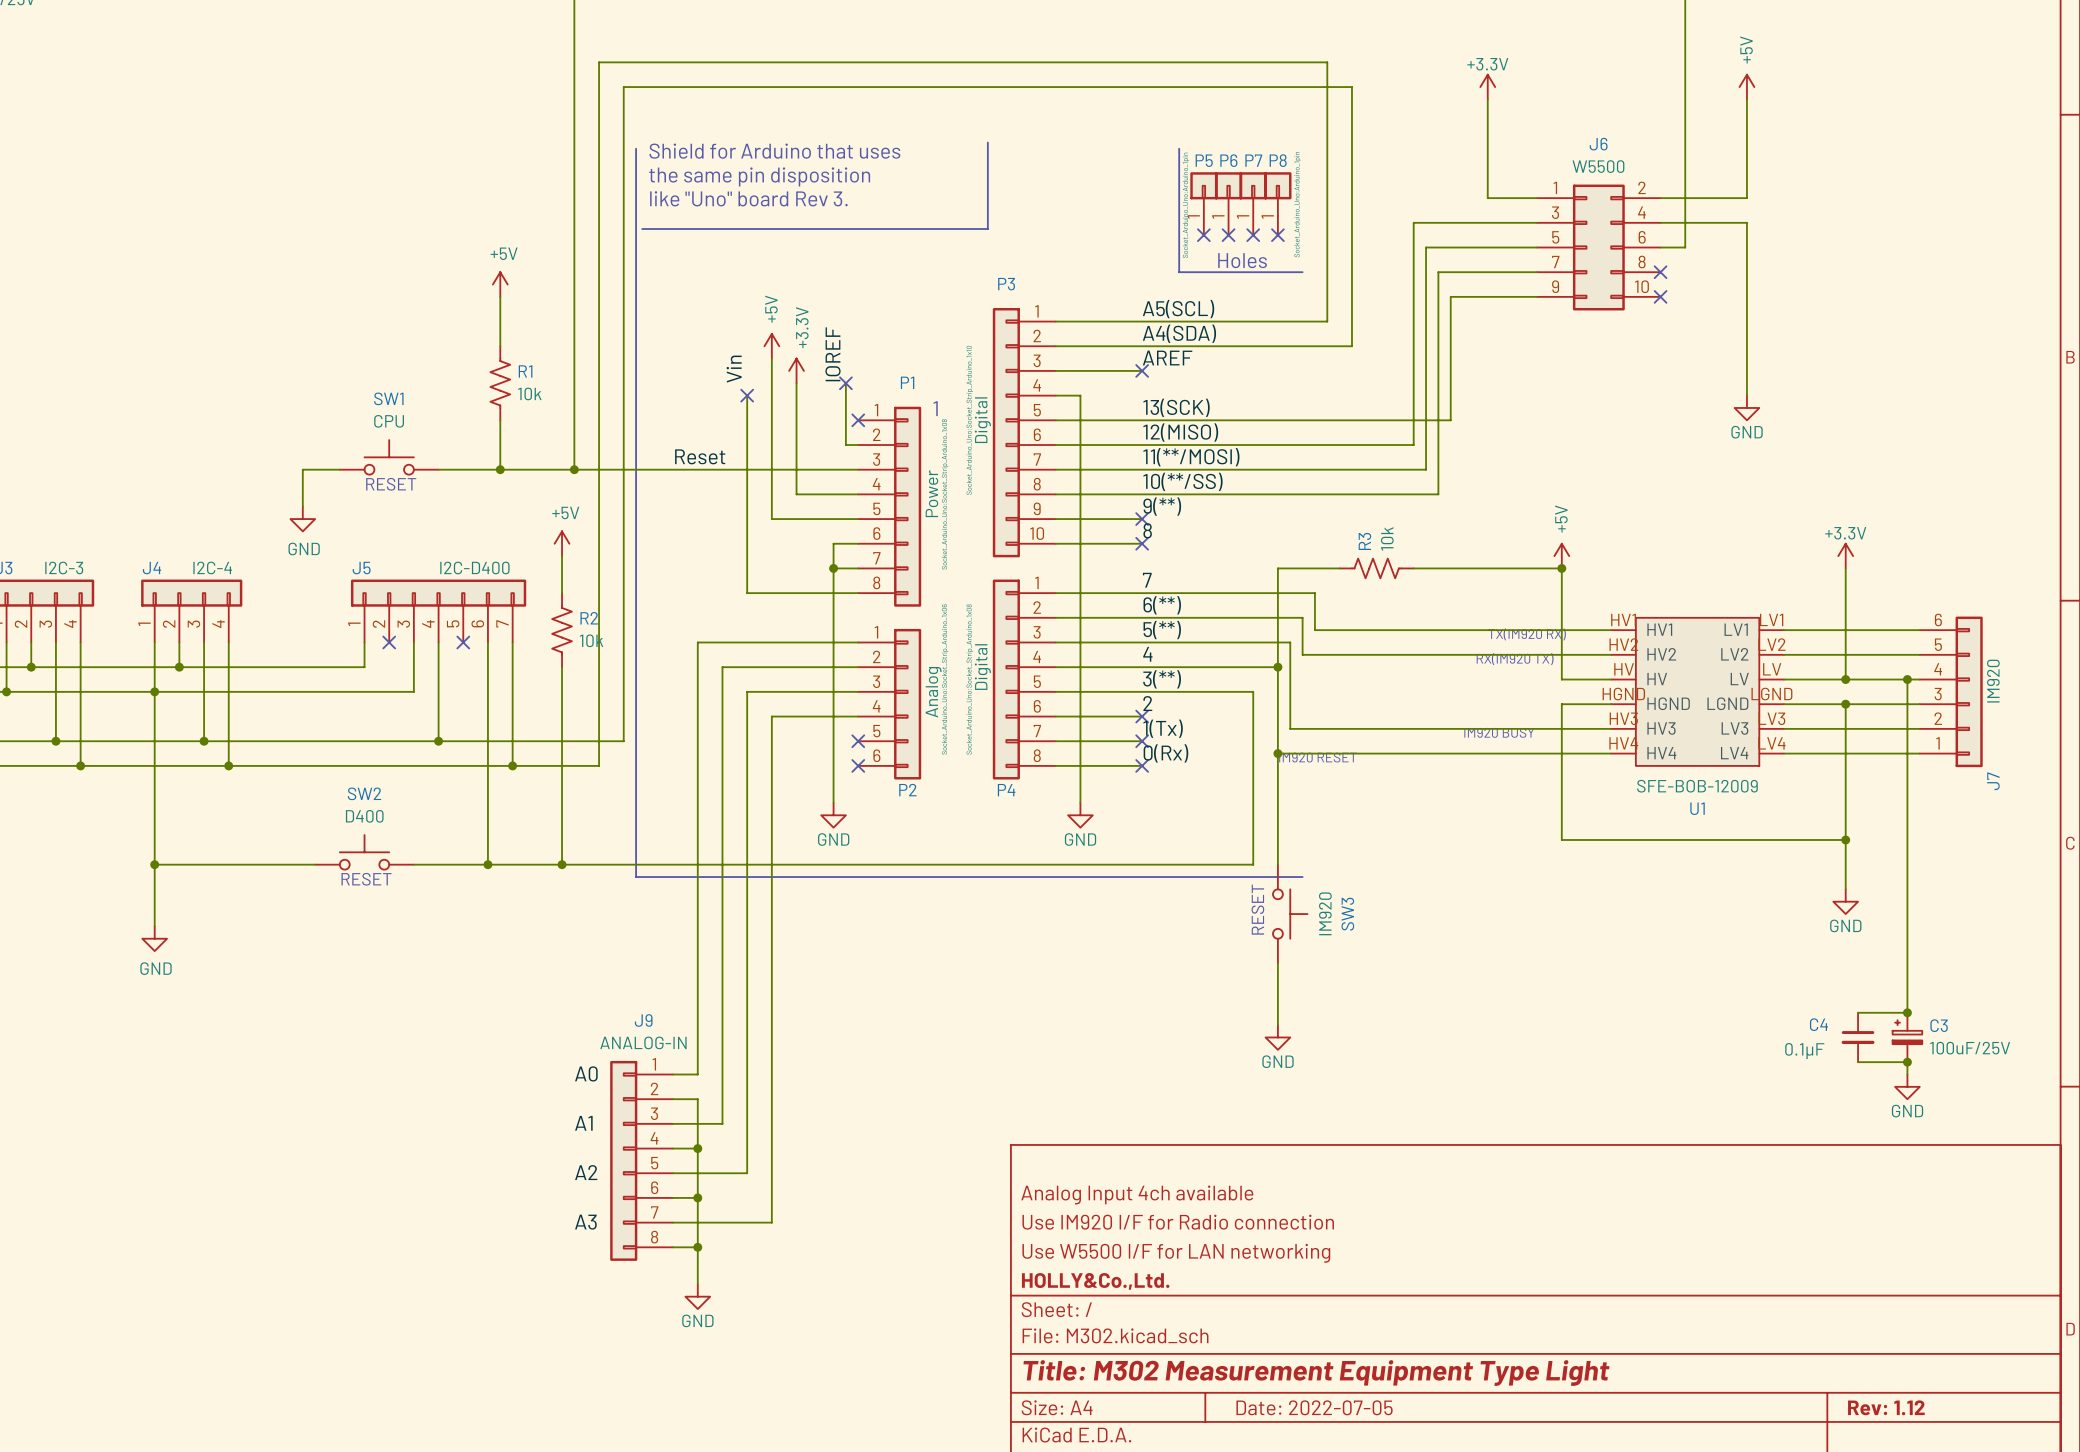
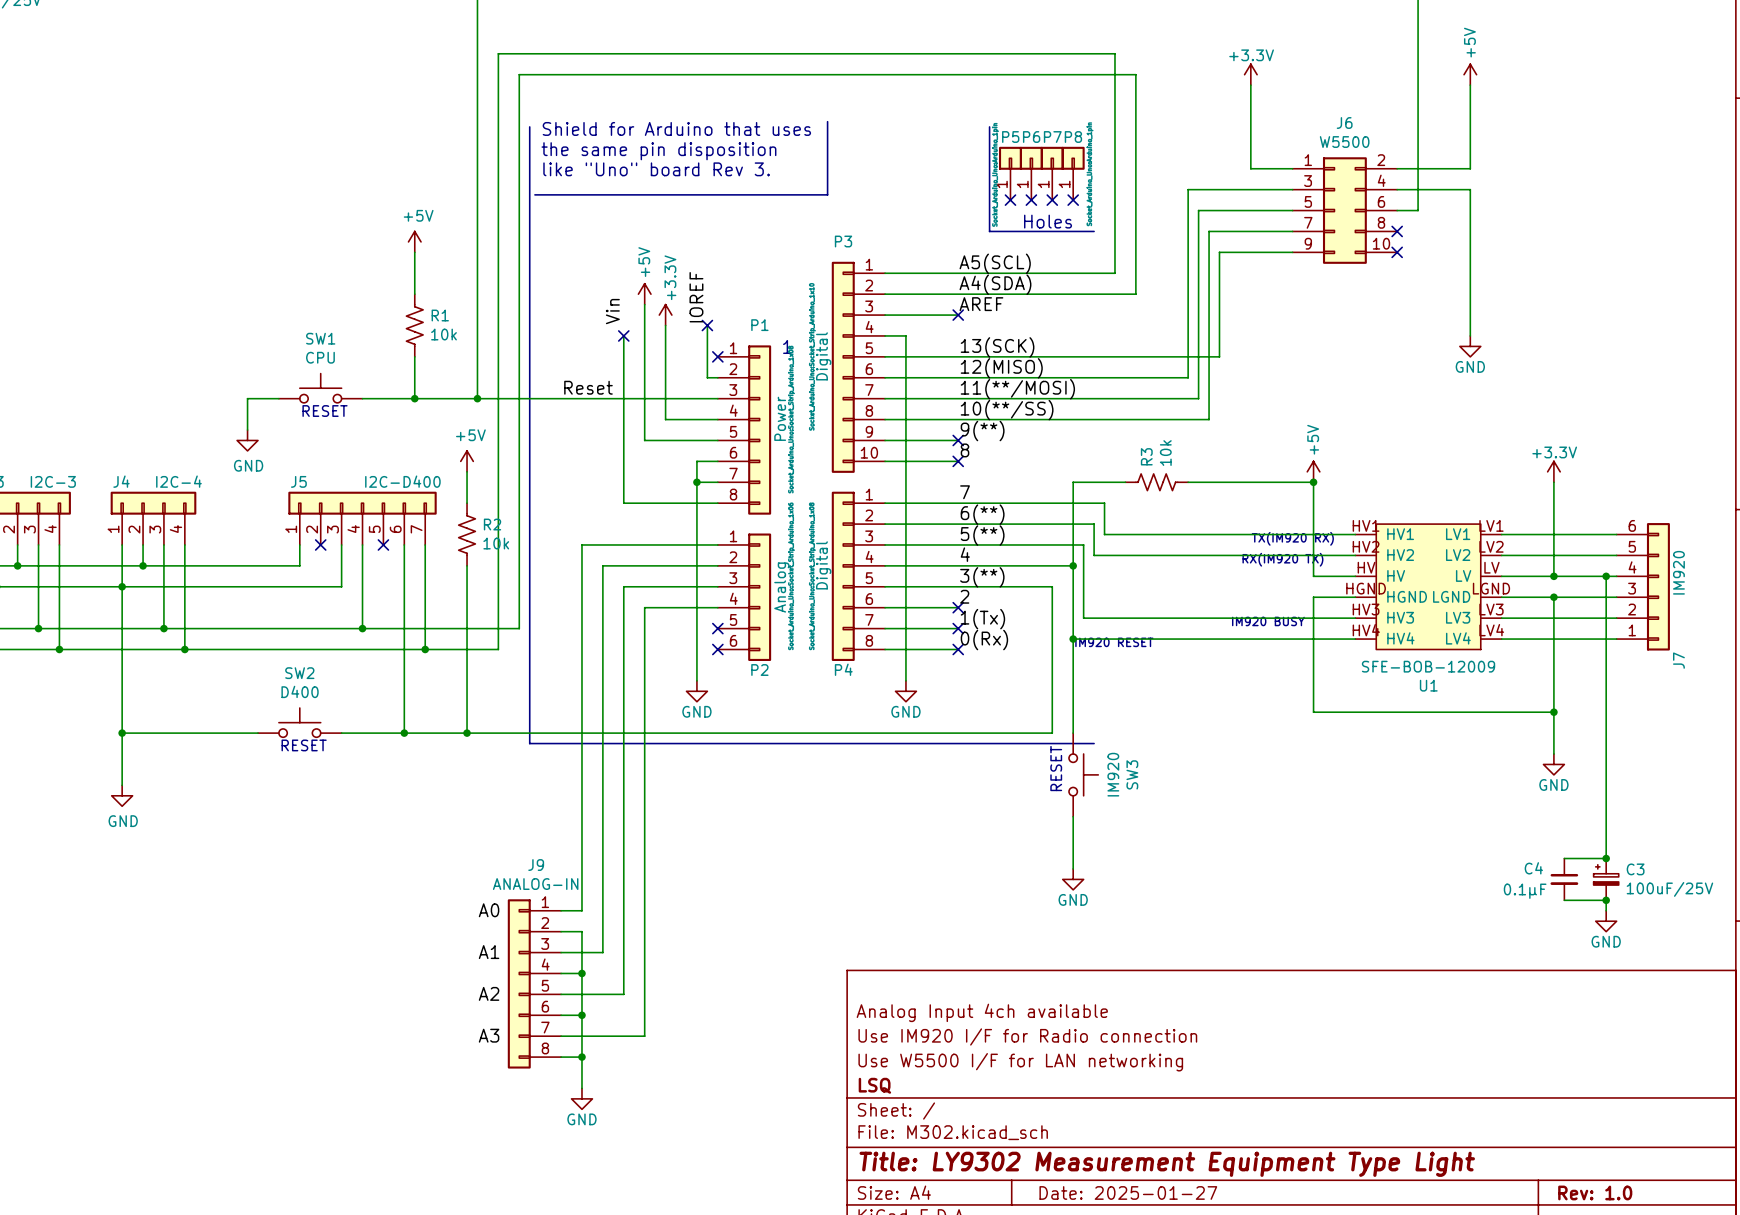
title block: HOLLY&Co.,Ltd. (1095, 1281) -> LSQ (874, 1085)
title block: Title: M302 Measurement Equipment Type Light (1316, 1373) -> Title: LY9302 Measurement Equipment Type Light (1167, 1164)
title block: Date: 2022-07-05 (1314, 1407) -> Date: 2025-01-27 (1128, 1192)
title block: Rev: 1.12 (1886, 1407) -> Rev: 1.0 (1595, 1192)

